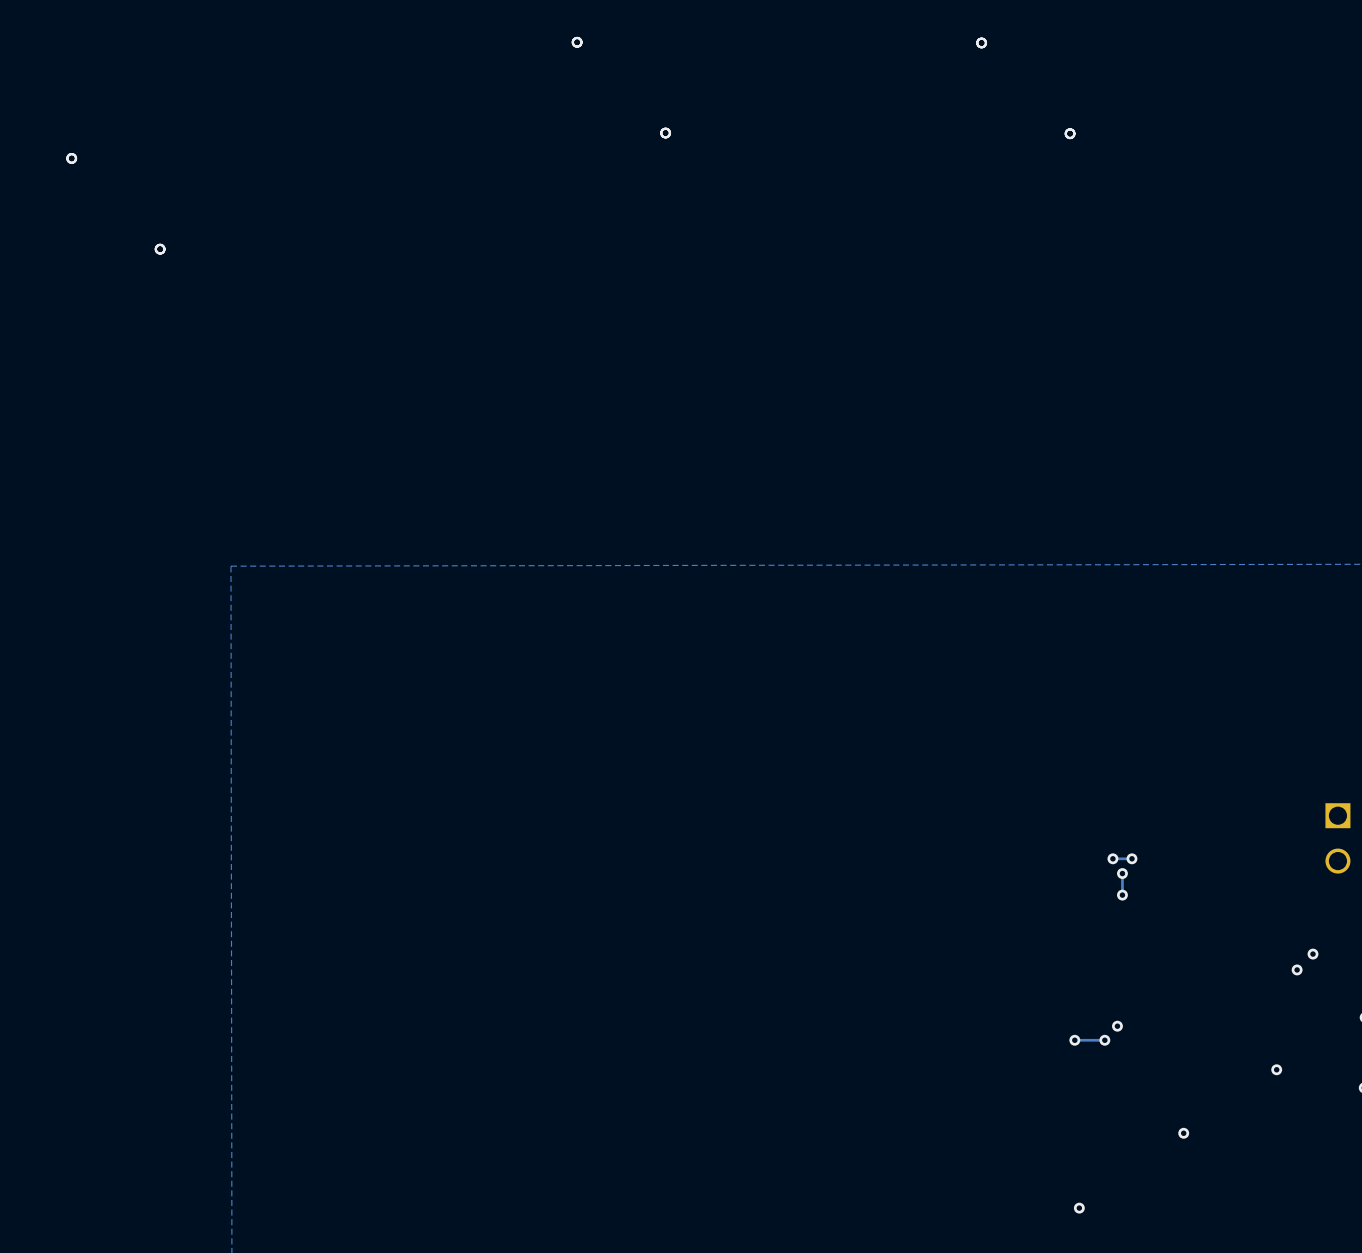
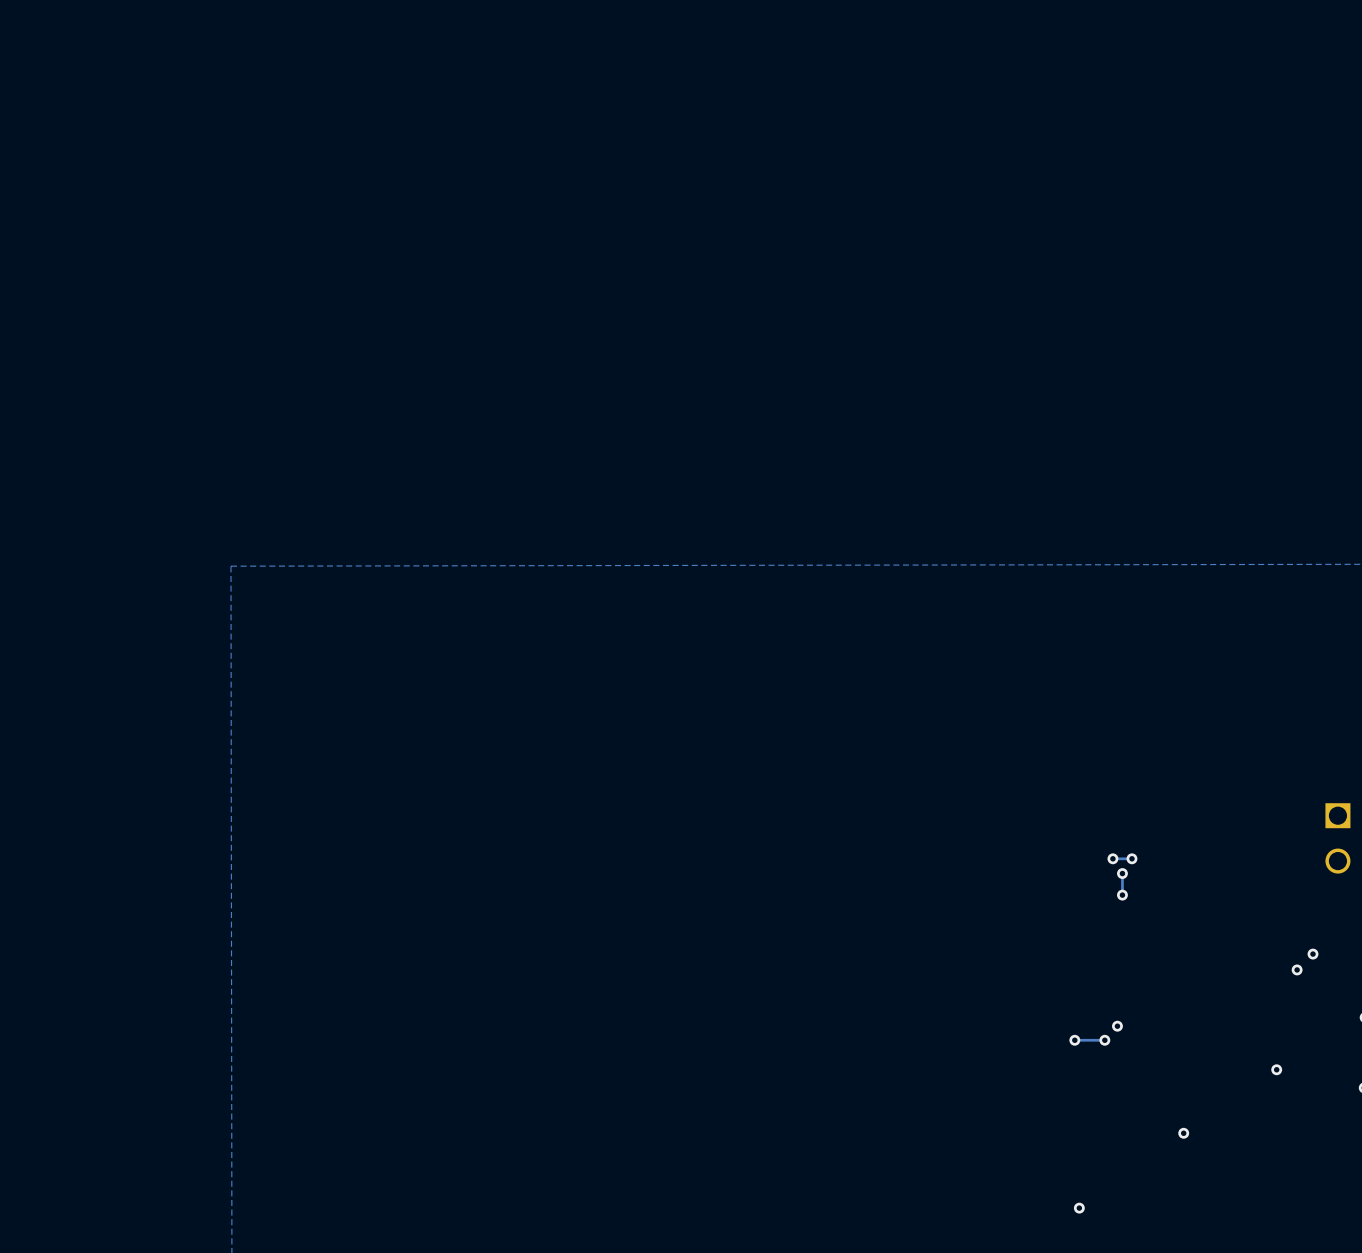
via: (577, 42) -> none
via: (981, 42) -> none
via: (665, 133) -> none
via: (1070, 133) -> none
via: (71, 158) -> none
via: (160, 249) -> none

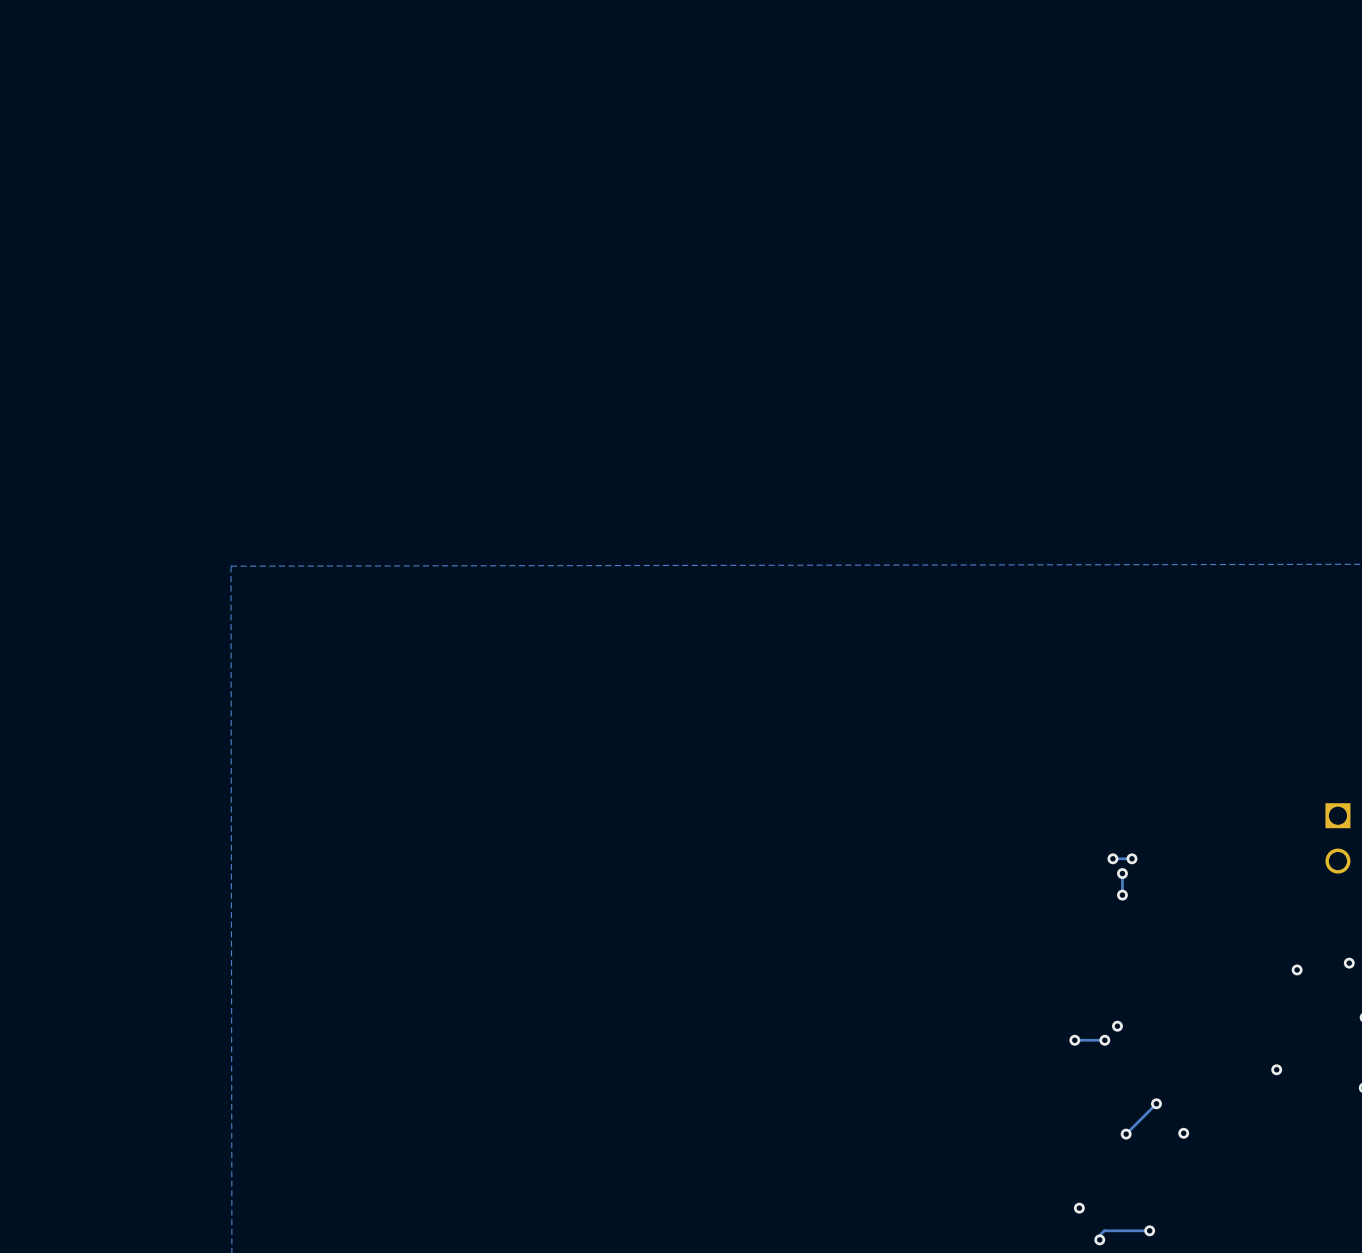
via position: (1312, 954) -> (1349, 963)
track: none -> (1156, 1103) (1126, 1134)
via: none -> (1156, 1103)
via: none -> (1126, 1134)
track: none -> (1149, 1230) (1104, 1230) (1099, 1235) (1099, 1239)
via: none -> (1149, 1230)
via: none -> (1099, 1239)

